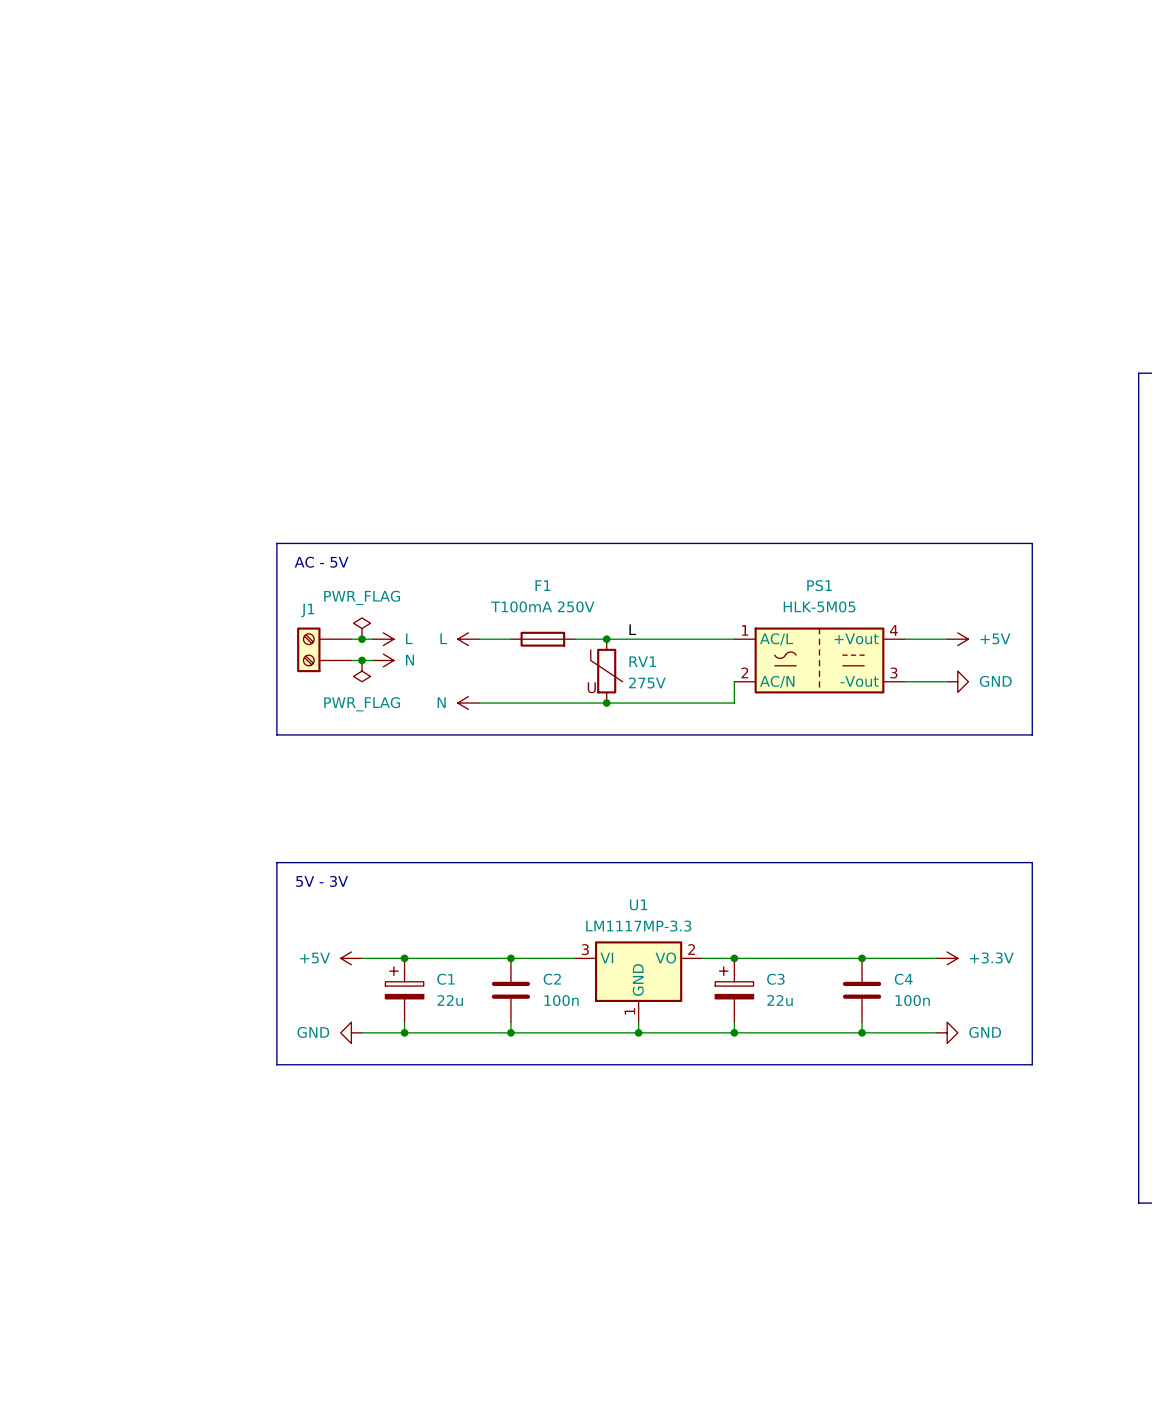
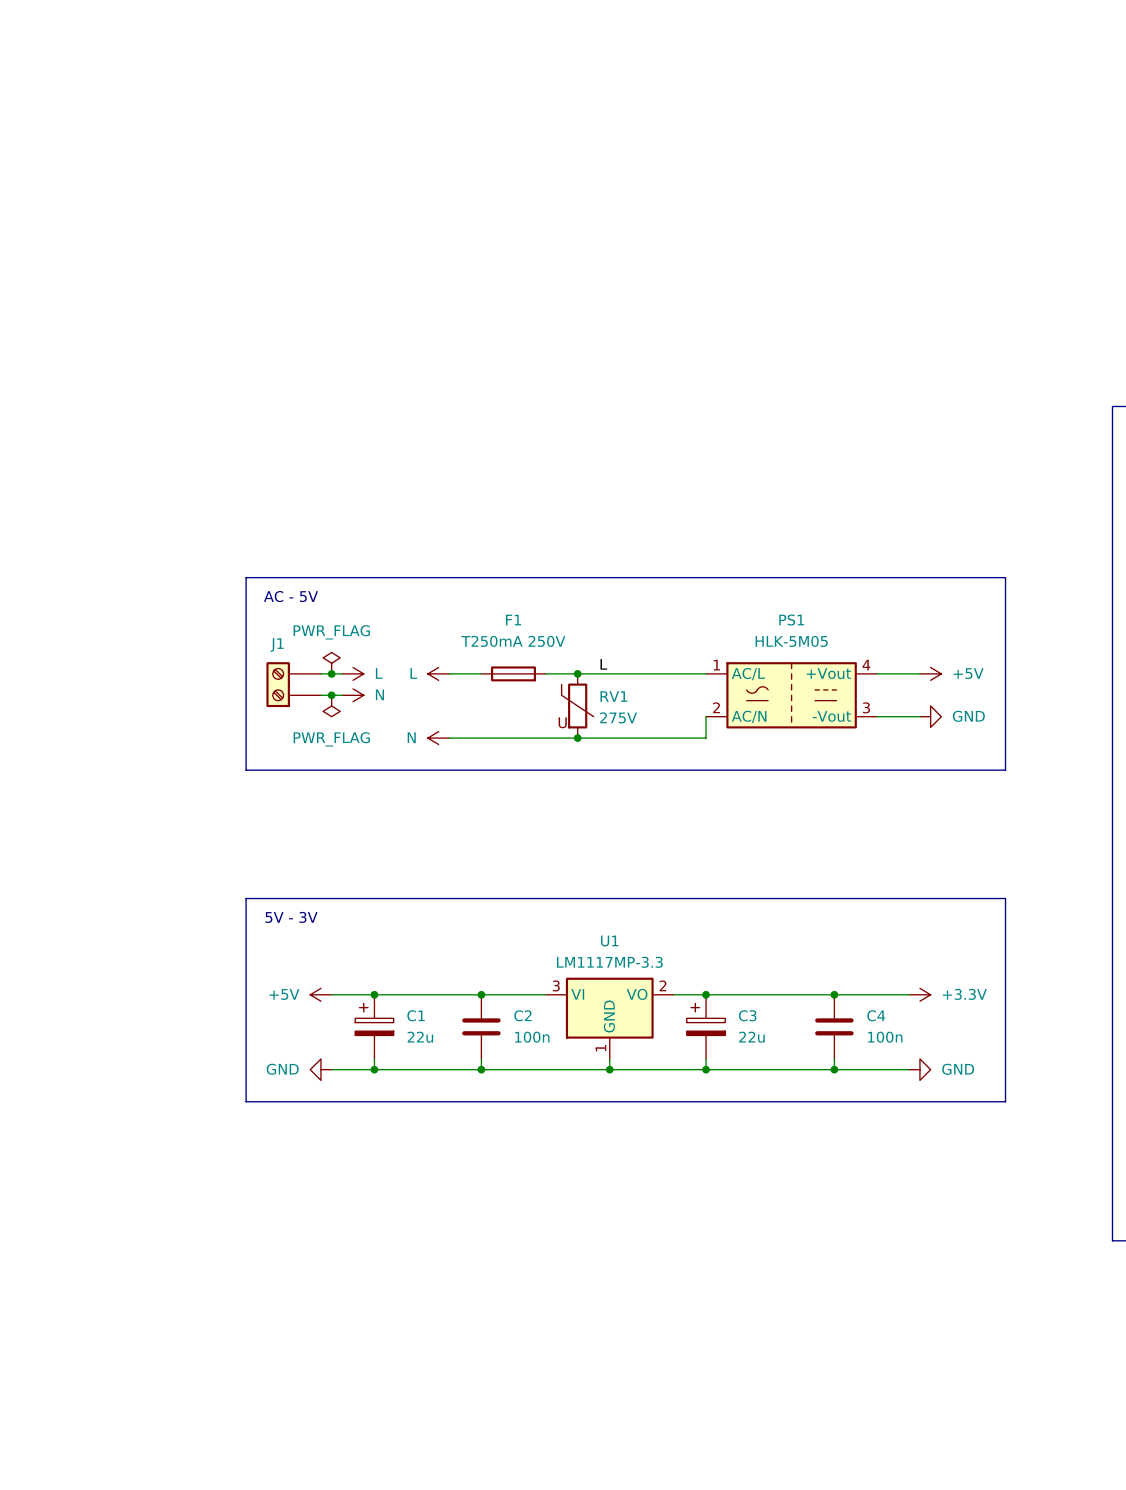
F1 value: T100mA 250V (542, 606) -> T250mA 250V (513, 641)

